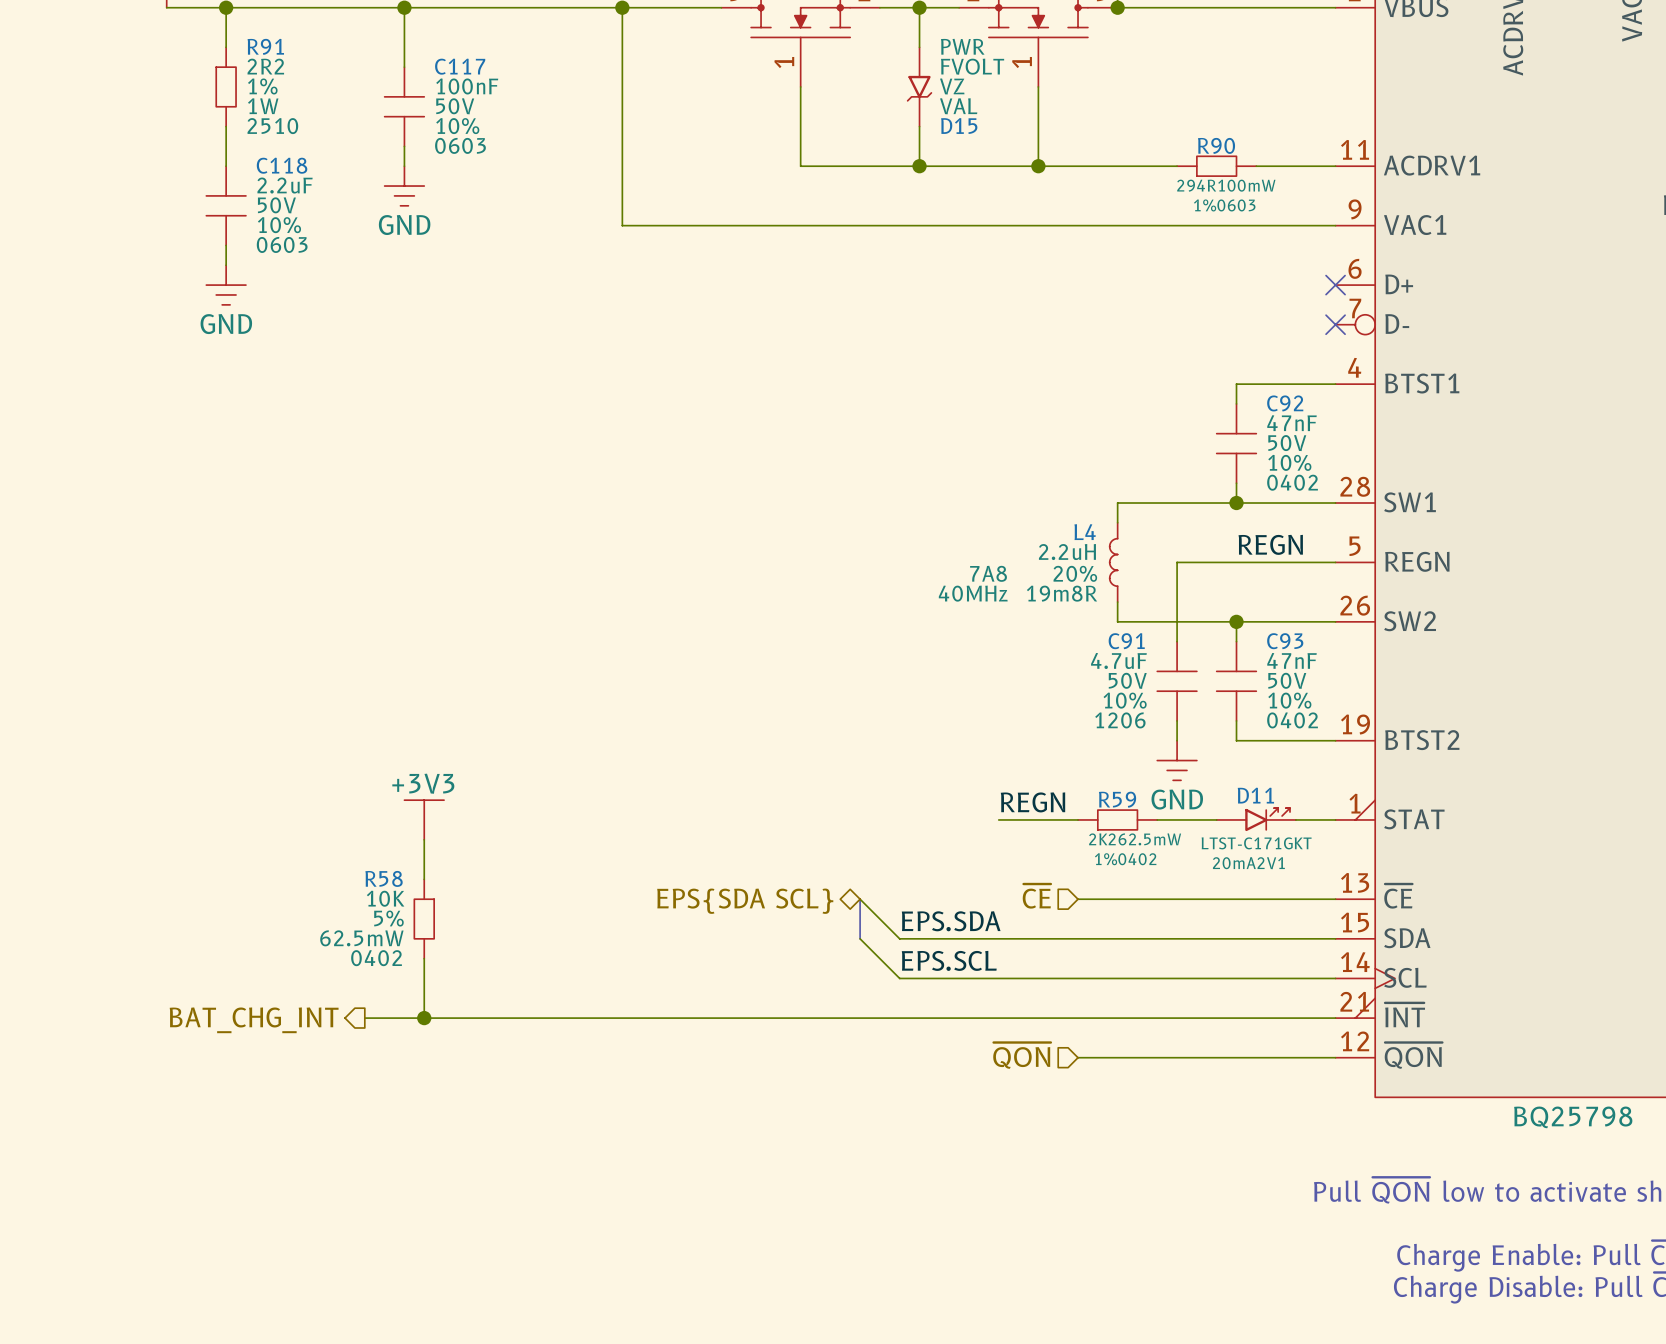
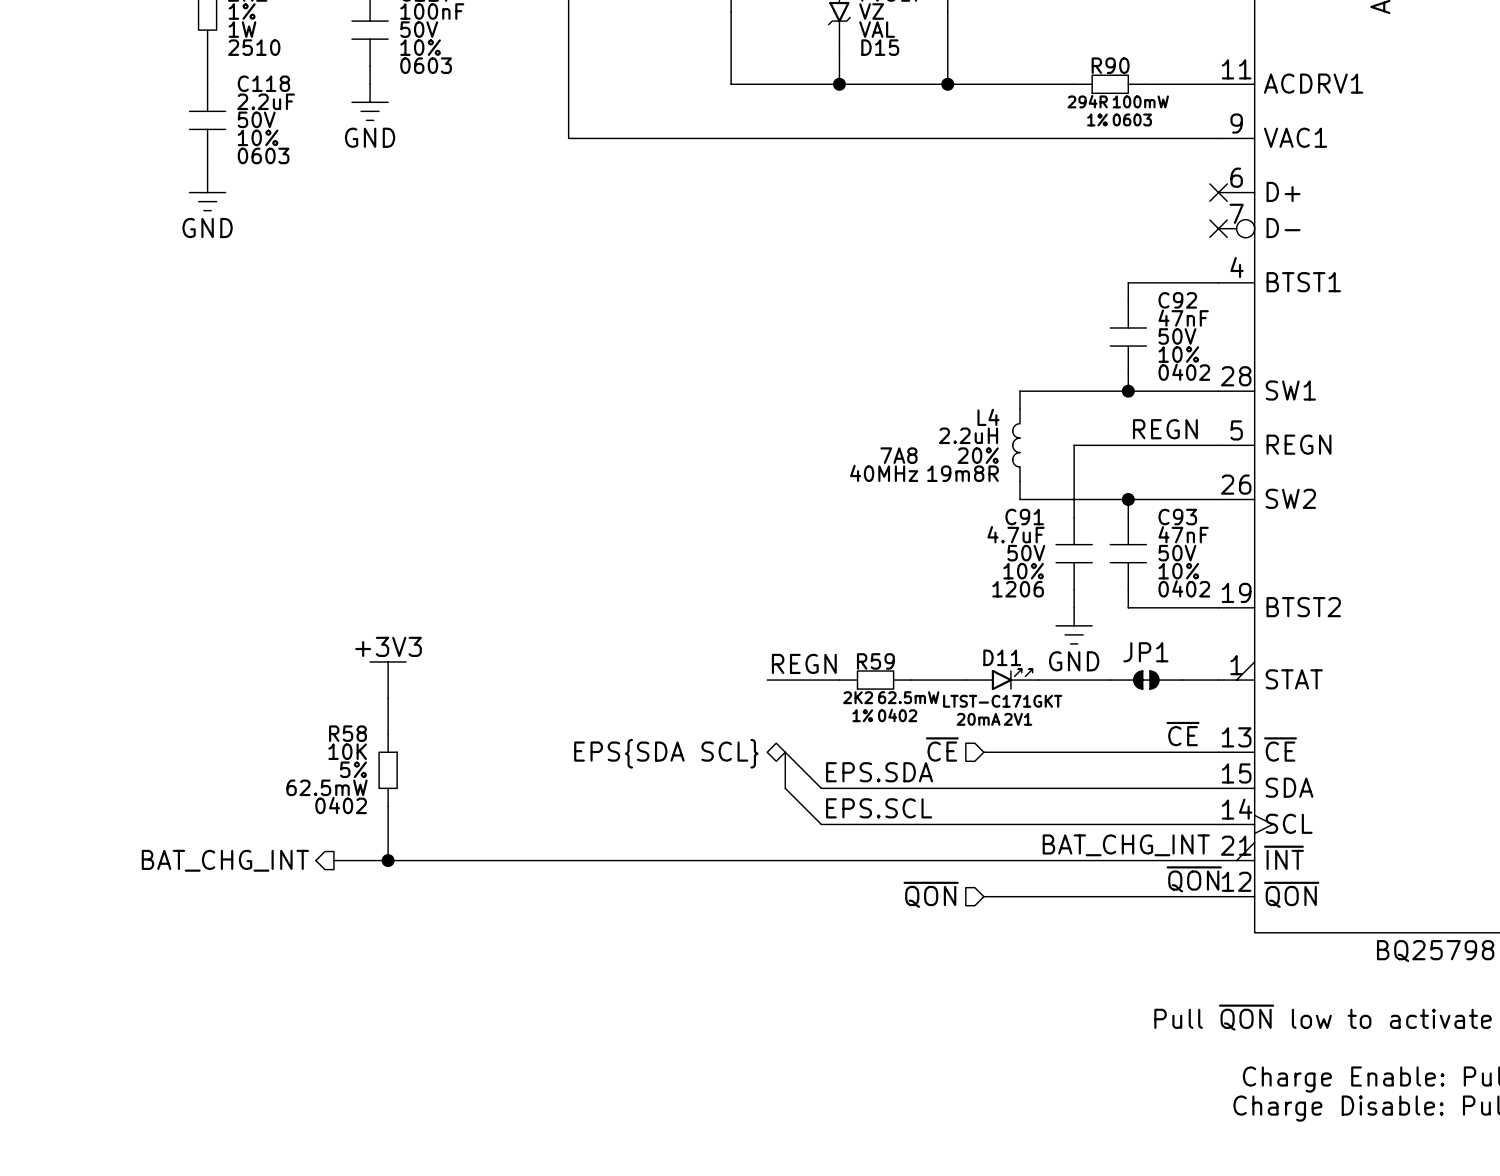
label position: REGN (1032, 802) -> REGN (804, 663)
wire: none -> (767, 680) (839, 680)
R59 position: (1117, 819) -> (875, 680)
D11 position: (1256, 819) -> (1001, 679)
JP1: none -> (1146, 680)
label: none -> ~{CE} (1183, 734)
label: none -> BAT_CHG_INT (1126, 845)
label: none -> ~{QON} (1194, 879)

